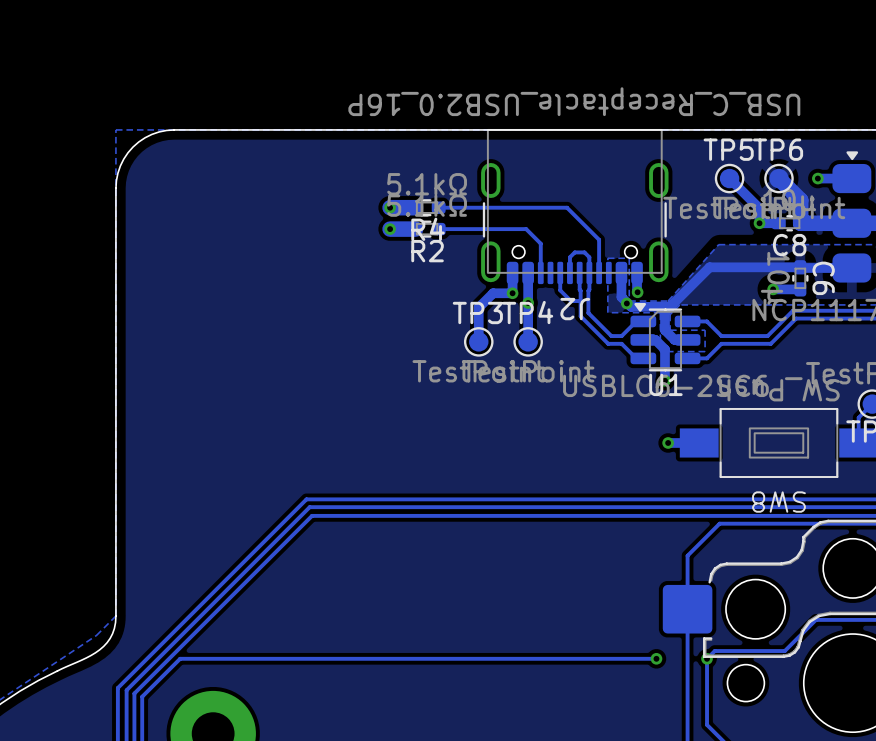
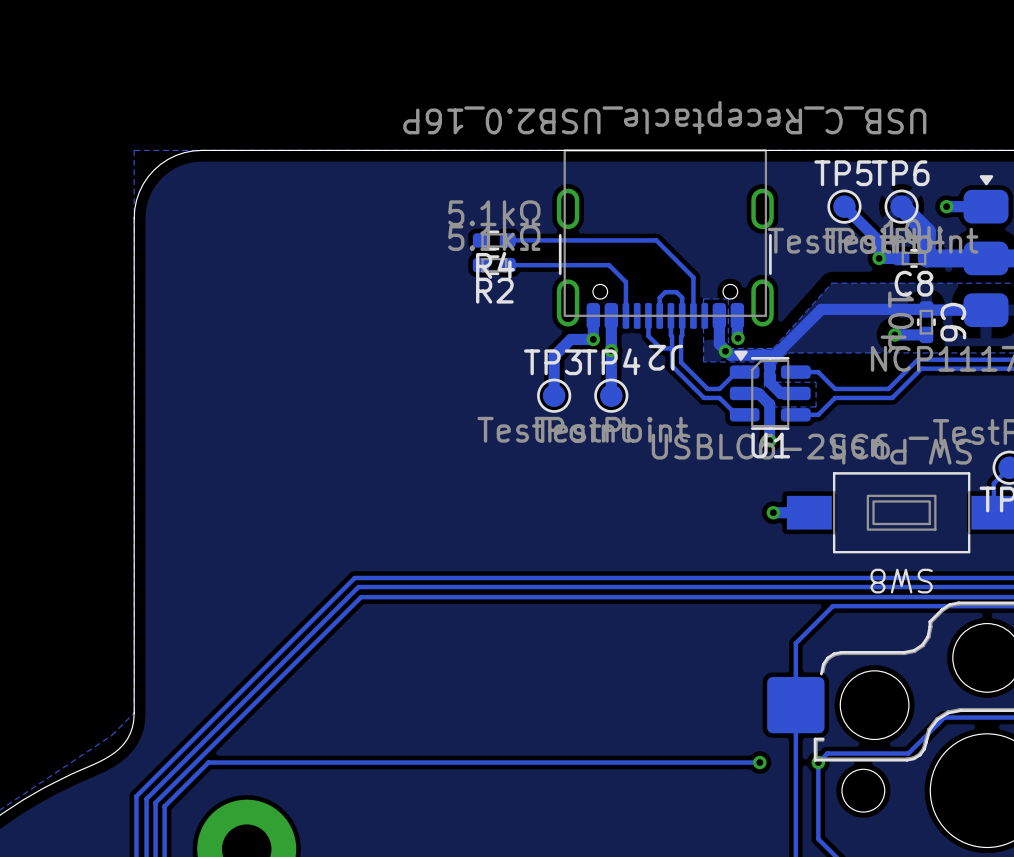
via: (390, 207) -> none
track: (415, 207) (390, 207) -> none
via: (390, 229) -> none
track: (415, 229) (390, 229) -> none

